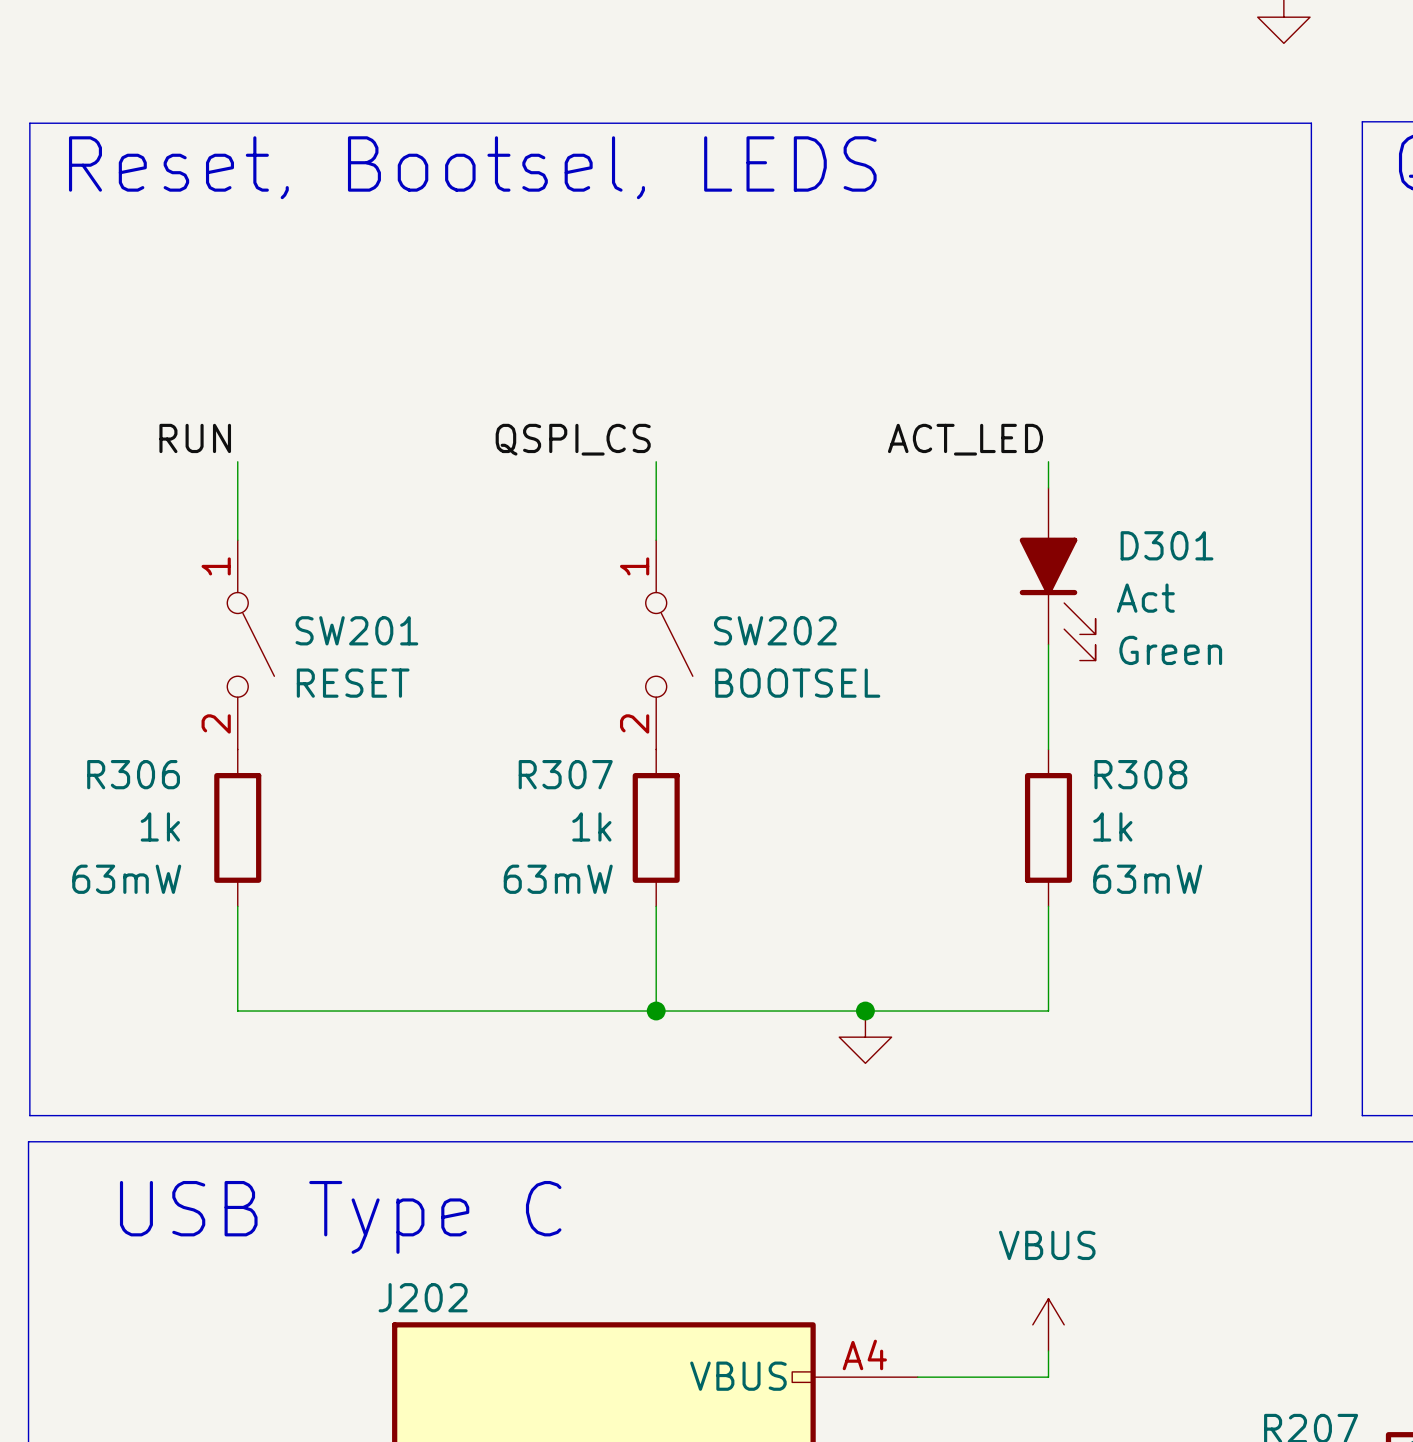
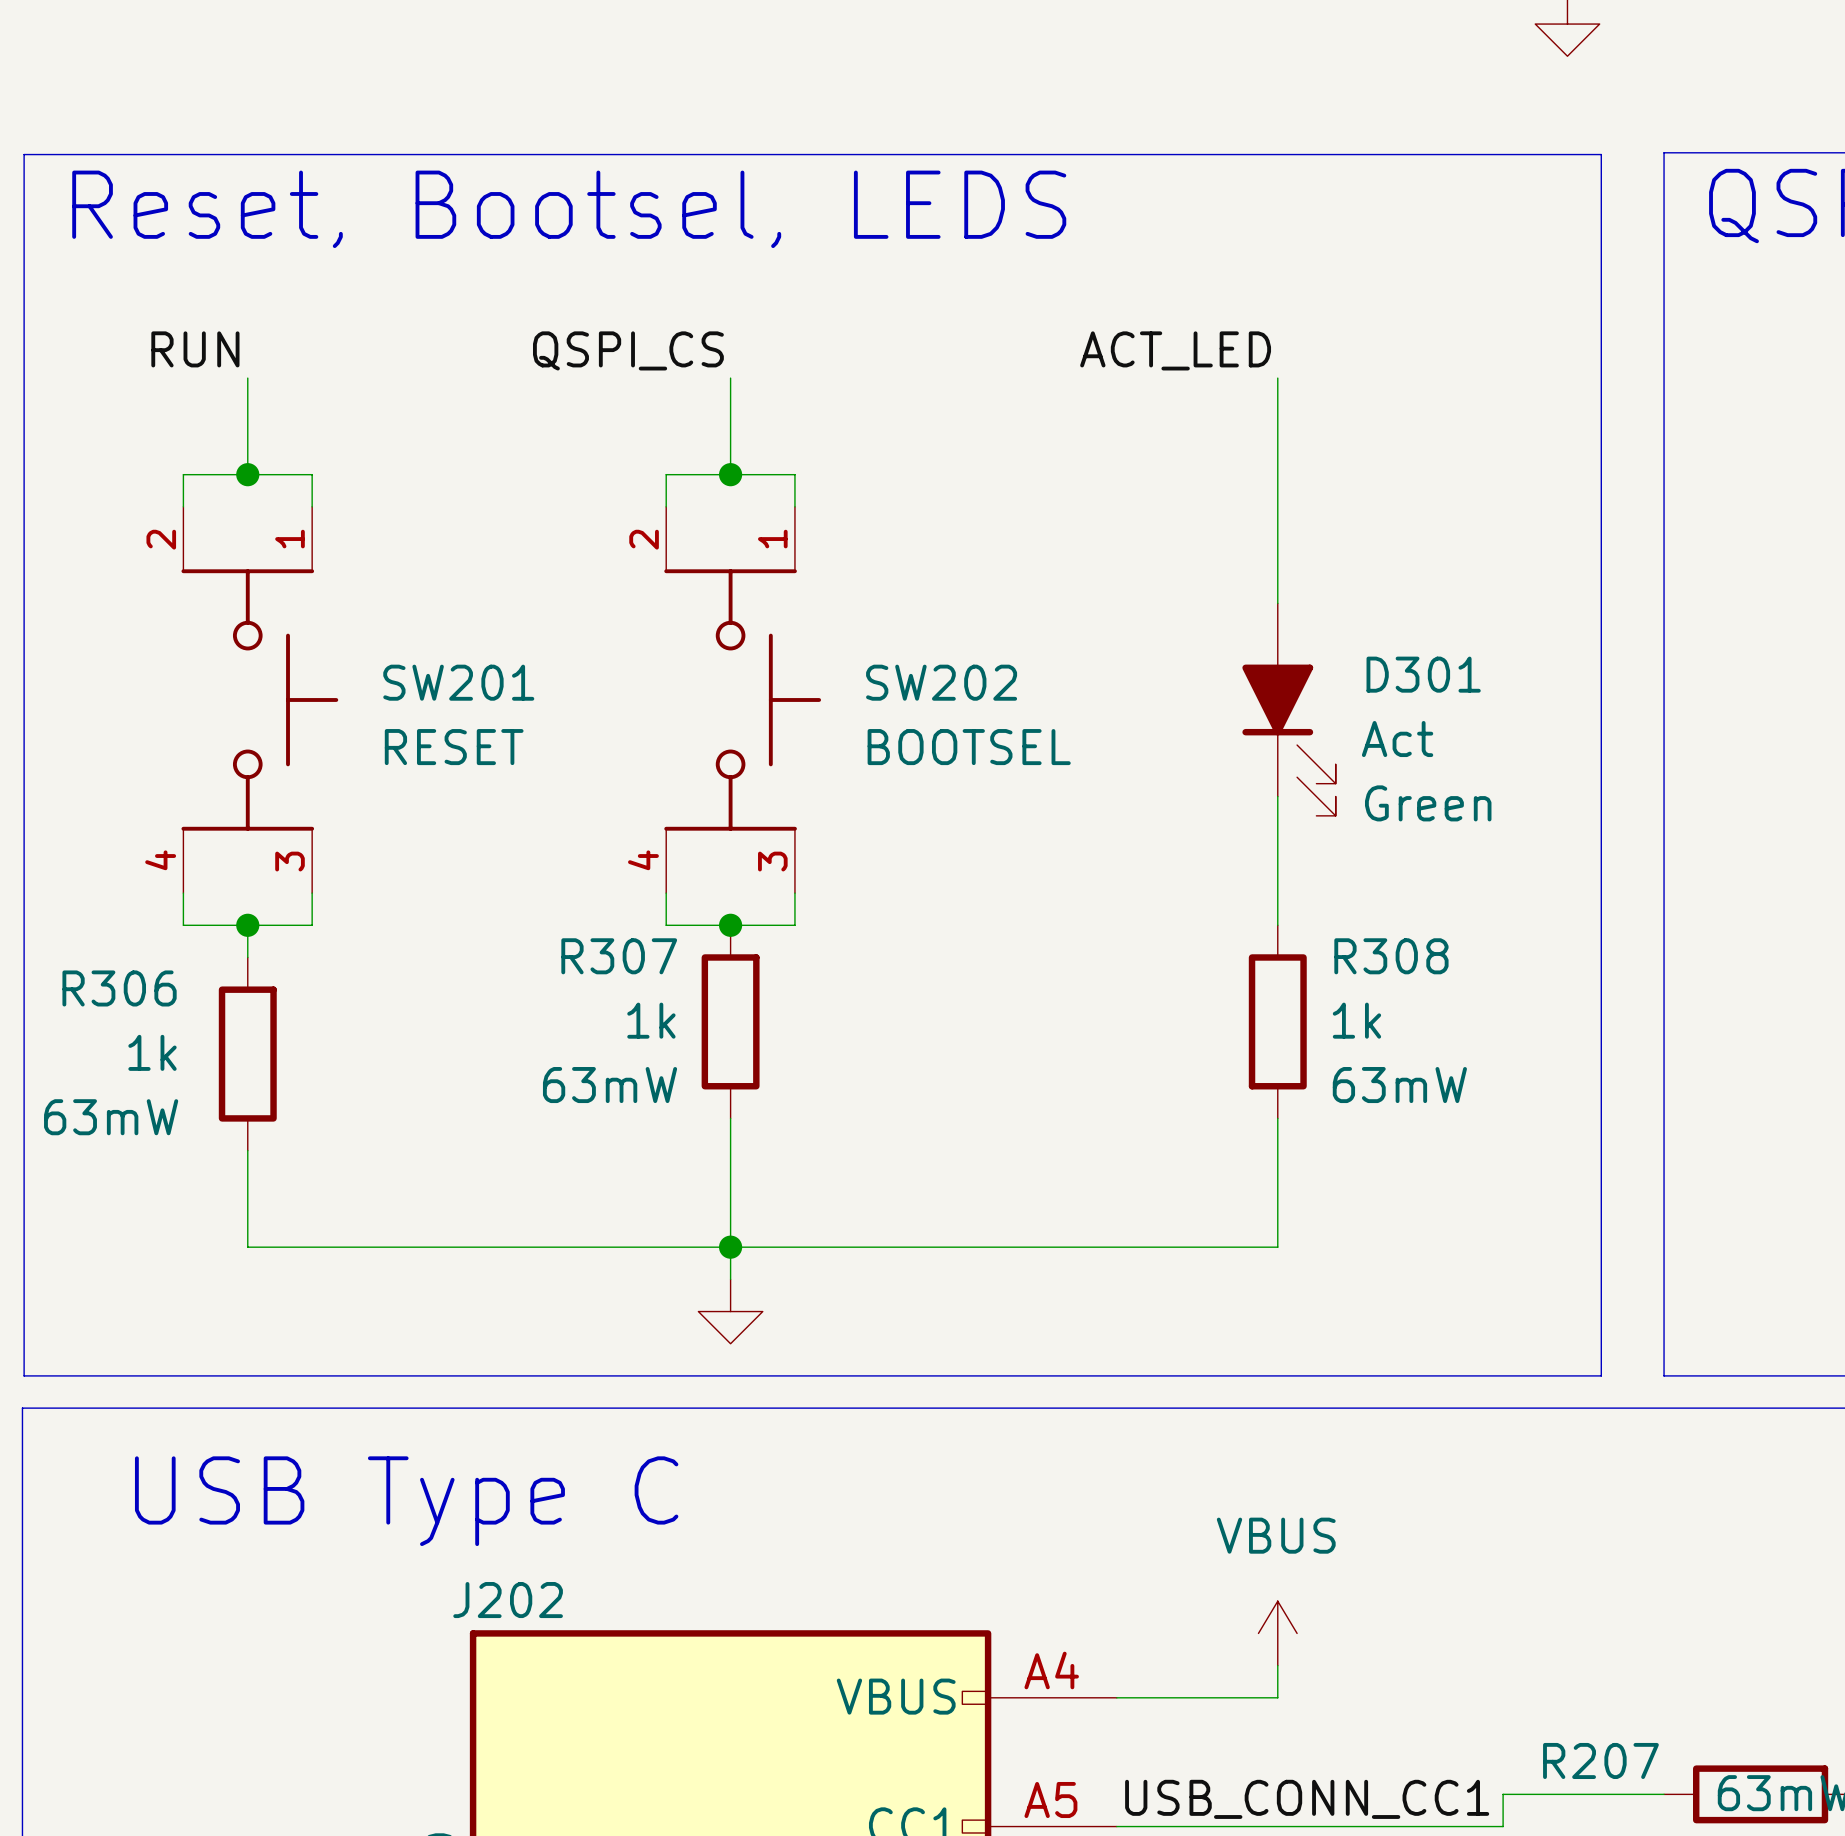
wire: none -> (1277, 378) (1277, 571)
junction: none -> (247, 474)
junction: none -> (730, 474)
wire: none -> (183, 506) (183, 474) (312, 474) (312, 506)
wire: none -> (666, 506) (666, 474) (794, 474) (794, 506)
label position: RUN (195, 438) -> RUN (195, 349)
label position: QSPI_CS (573, 439) -> QSPI_CS (628, 350)
label position: ACT_LED (965, 439) -> ACT_LED (1175, 350)
wire: (237, 461) (237, 540) -> (247, 378) (247, 474)
wire: (656, 461) (656, 540) -> (730, 378) (730, 474)
SW201 symbol: [227, 540, 275, 750] -> [181, 506, 339, 894]
SW202 symbol: [645, 540, 693, 750] -> [664, 506, 822, 894]
SW201 name position: SW201 (356, 630) -> SW201 (458, 682)
SW202 name position: SW202 (775, 630) -> SW202 (941, 682)
SW201 value position: RESET (353, 683) -> RESET (454, 747)
SW202 value position: BOOTSEL (797, 683) -> BOOTSEL (969, 747)
wire: none -> (183, 893) (183, 925) (312, 925) (312, 893)
wire: none -> (666, 893) (666, 925) (794, 925) (794, 893)
wire: none -> (247, 925) (247, 957)
junction: none -> (247, 925)
junction: none -> (730, 925)
R306 position: (237, 827) -> (247, 1054)
R307 position: (656, 827) -> (730, 1021)
wire: (237, 906) (237, 1011) -> (247, 1150) (247, 1247) (279, 1247)
wire: none -> (730, 1118) (730, 1279)
wire: (656, 906) (656, 1011) -> none
junction position: (656, 1011) -> (730, 1247)
junction: (865, 1011) -> none
power symbol position: (865, 1037) -> (730, 1311)

